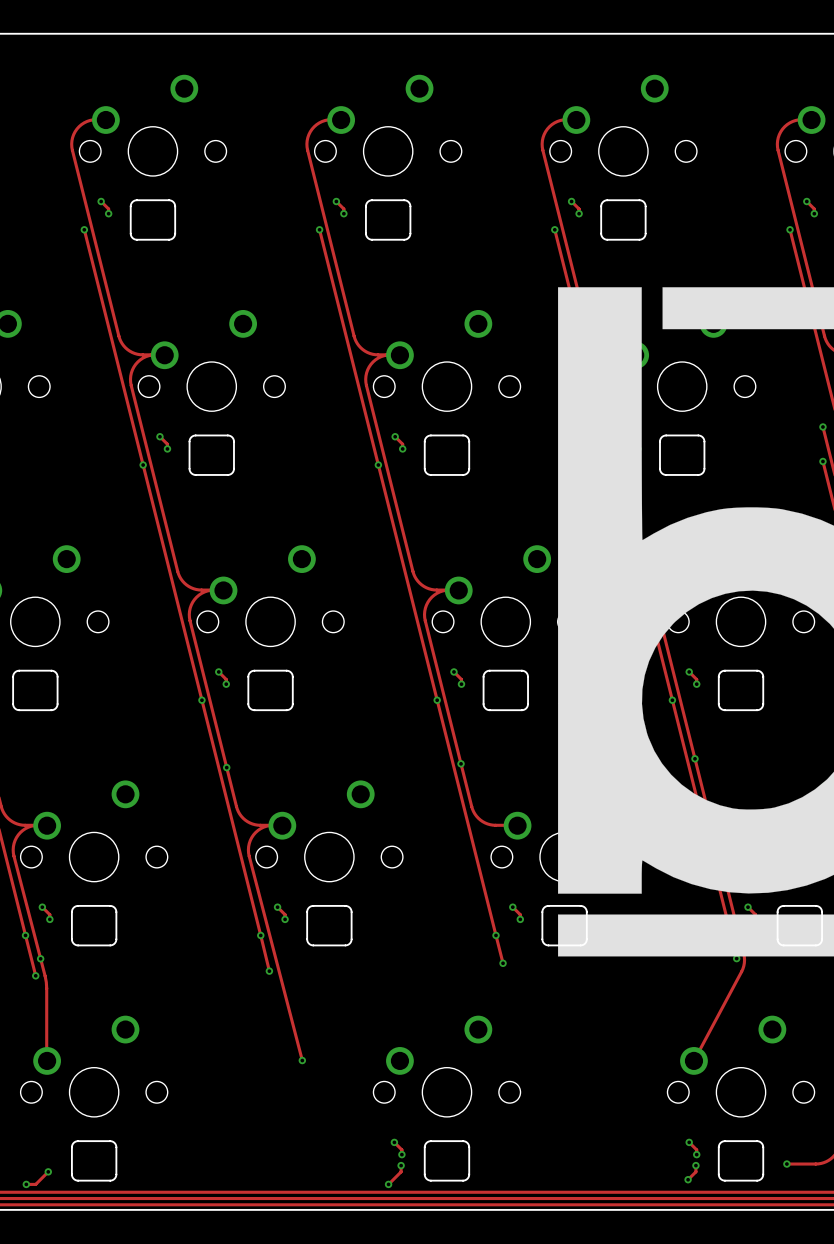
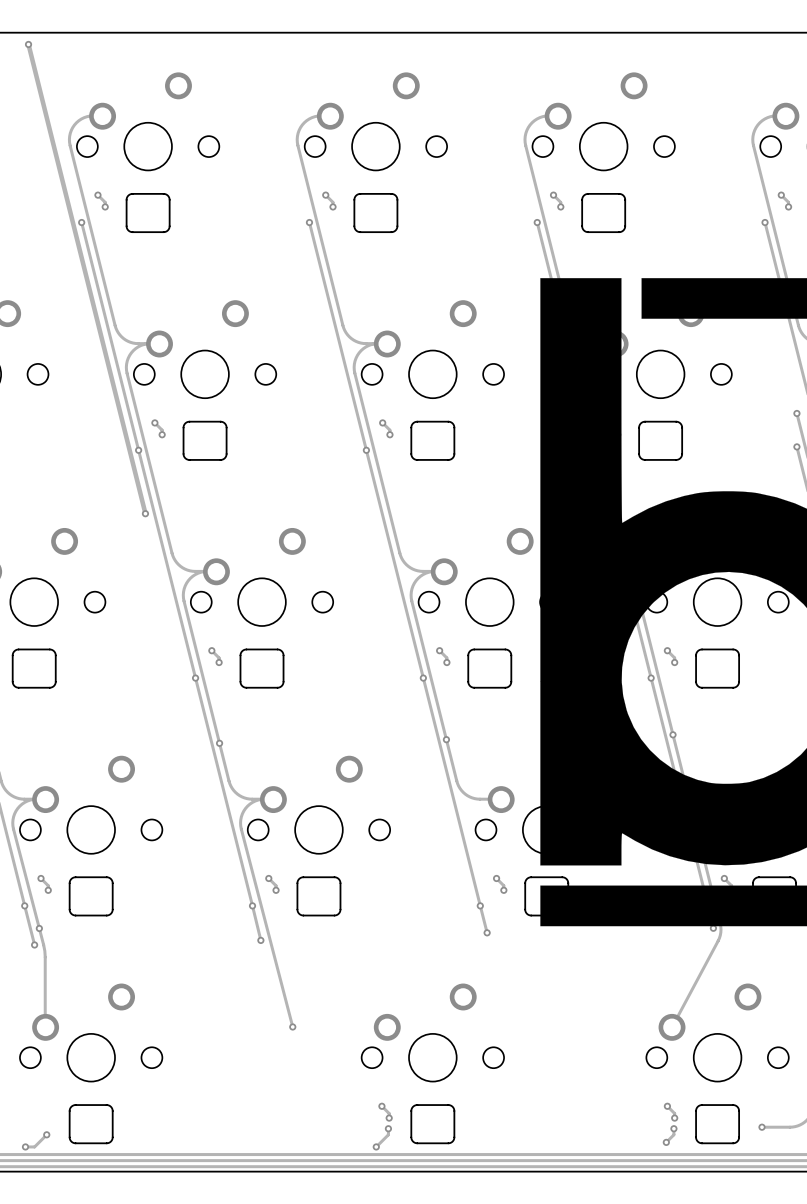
track: none -> (28, 44) (145, 513)
via: none -> (28, 44)
via: none -> (145, 513)

